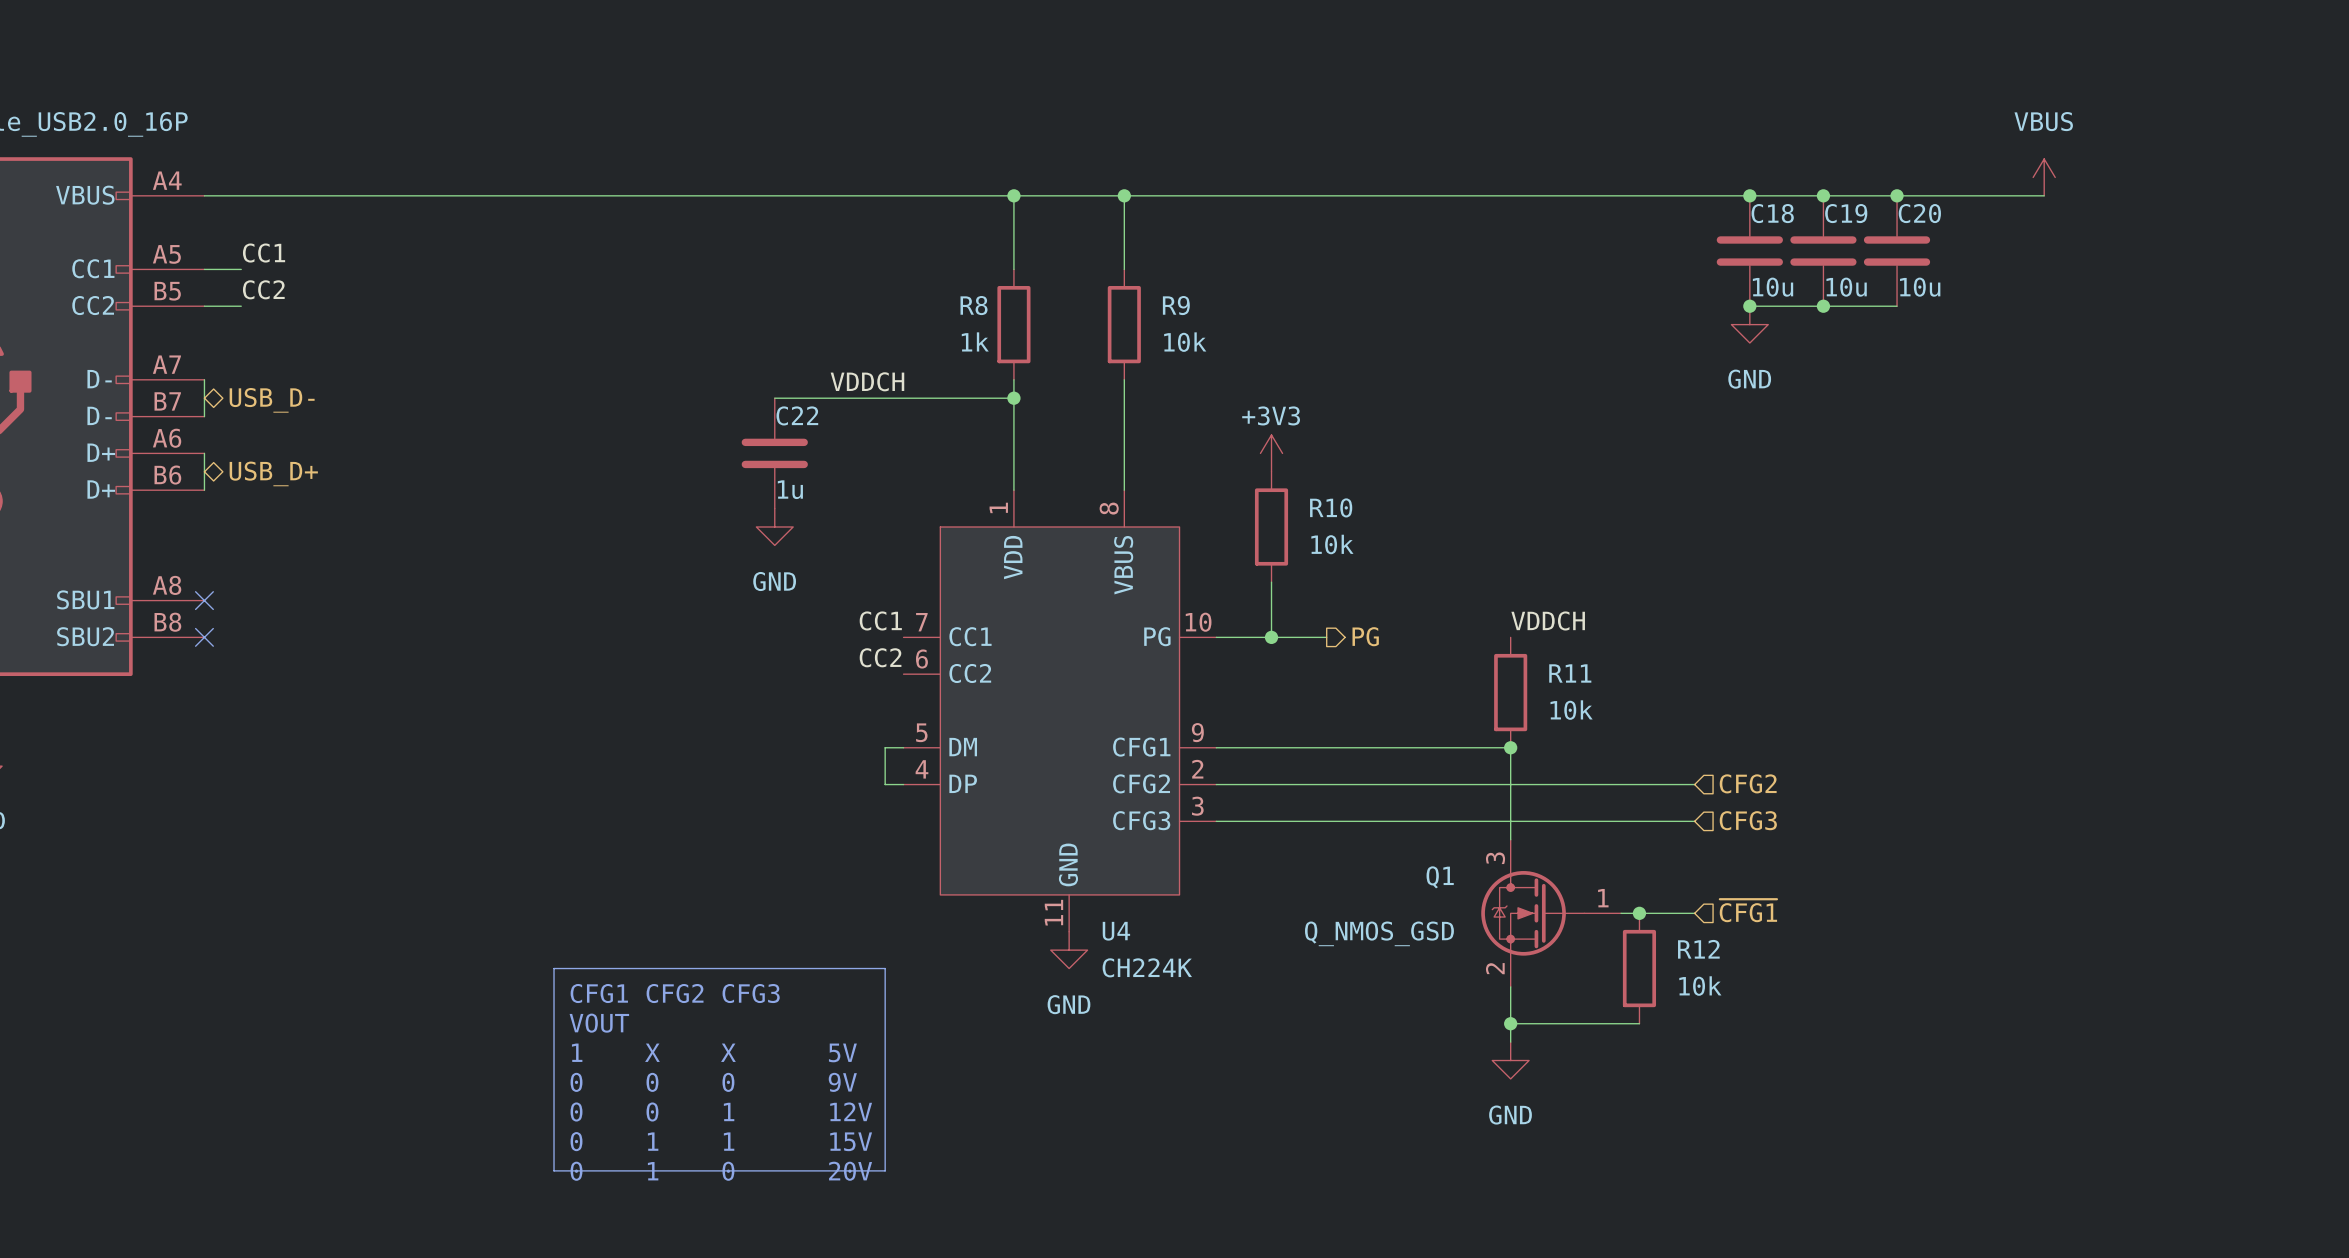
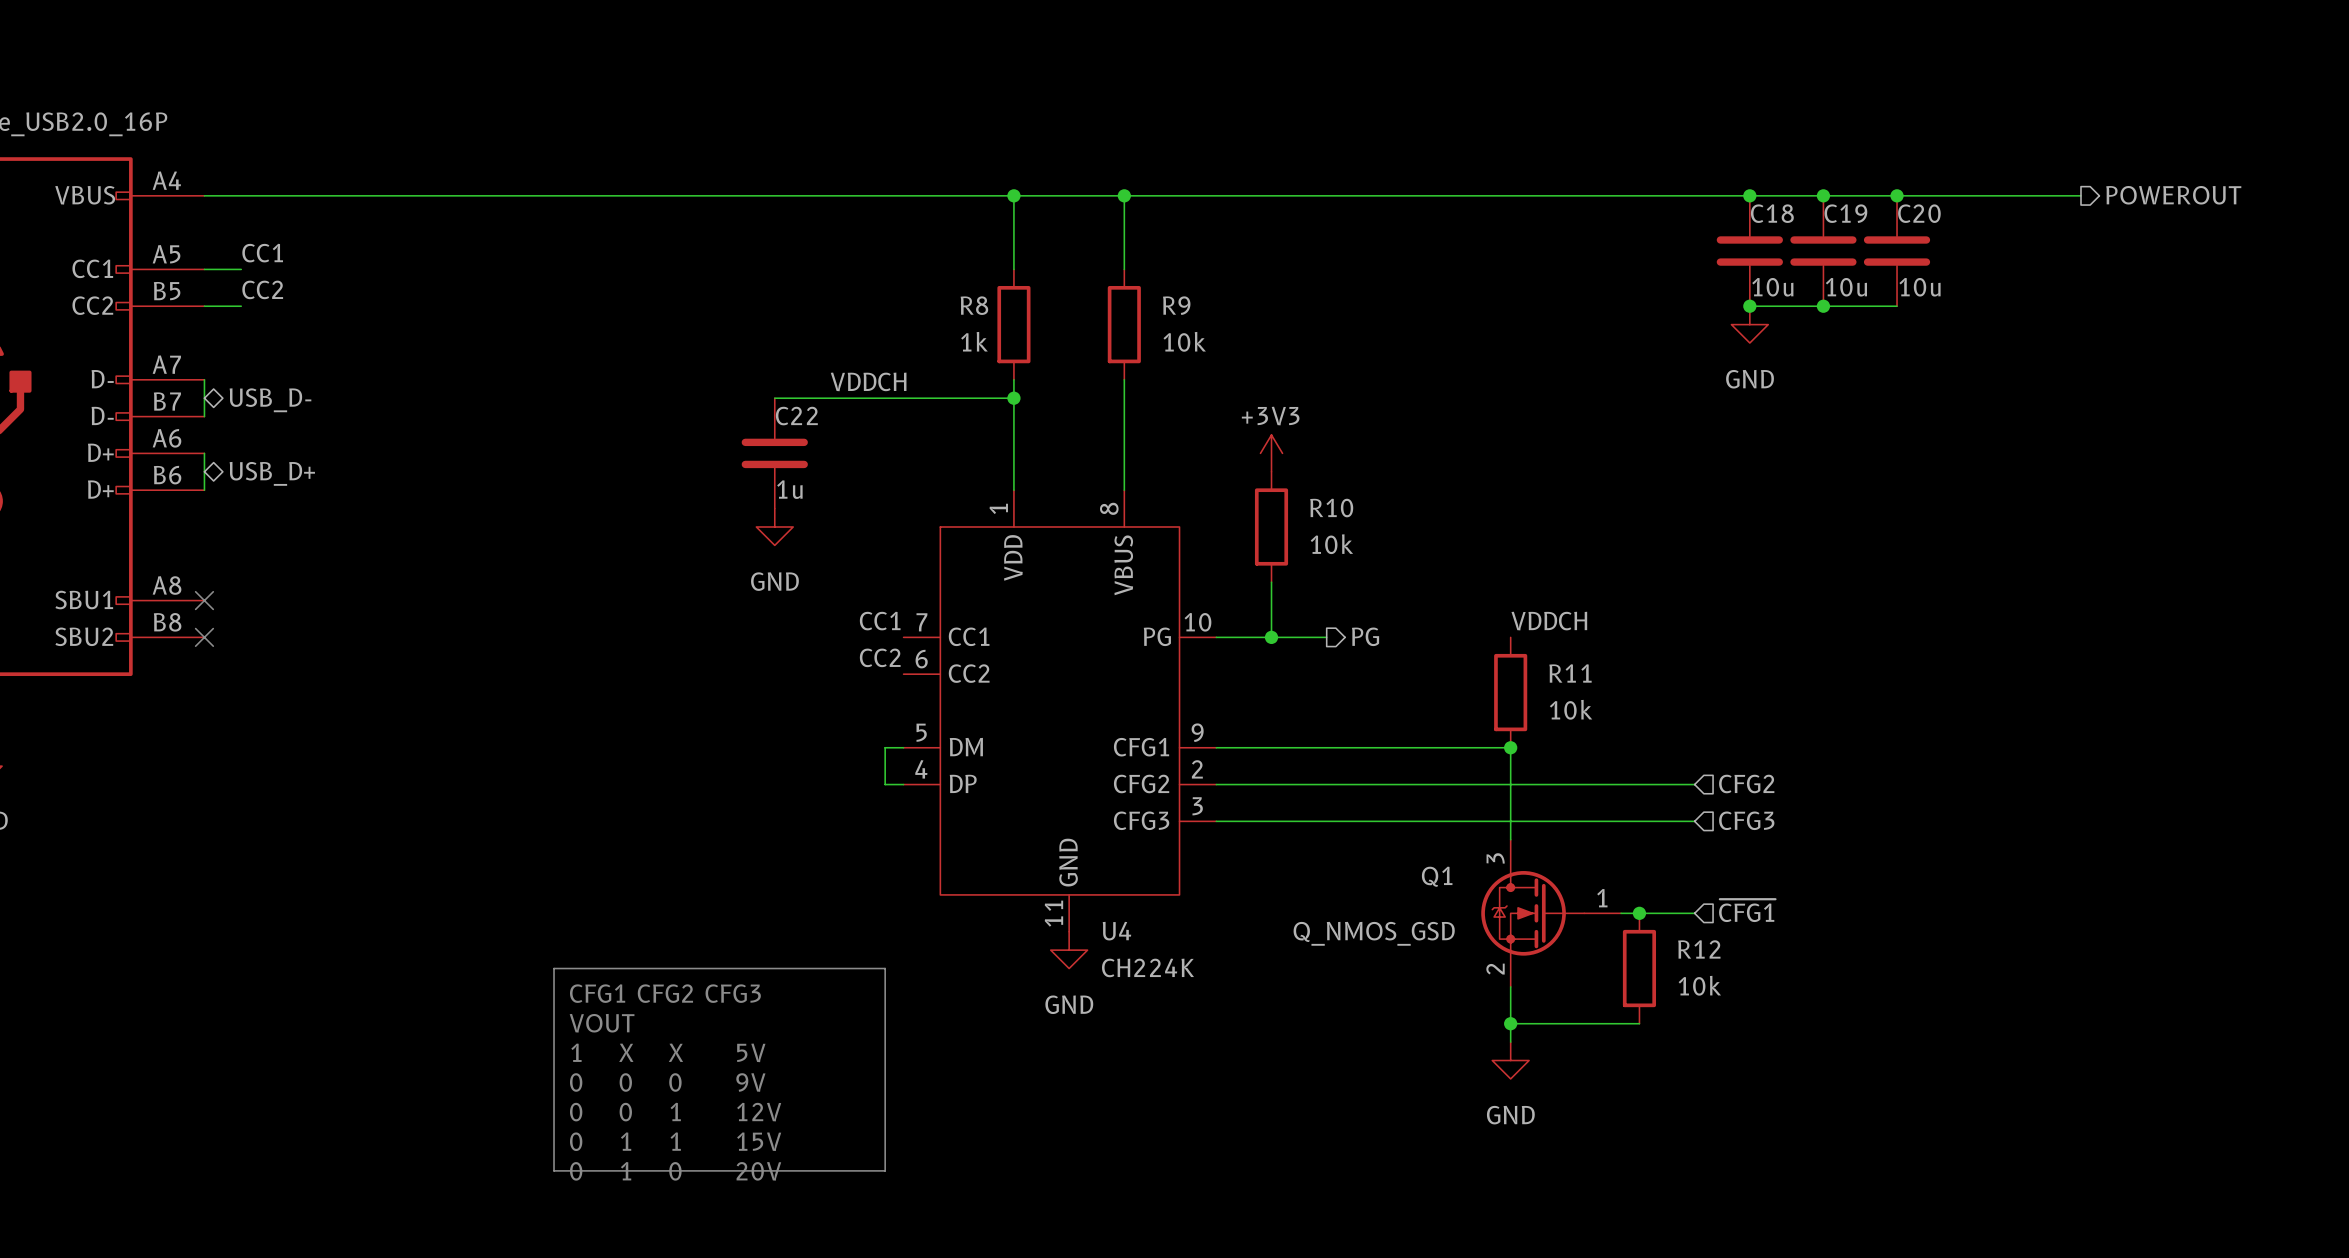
power symbol: VBUS (2044, 177) -> none
wire: none -> (2044, 195) (2081, 195)
hierarchical label: none -> POWEROUT (2173, 195)

